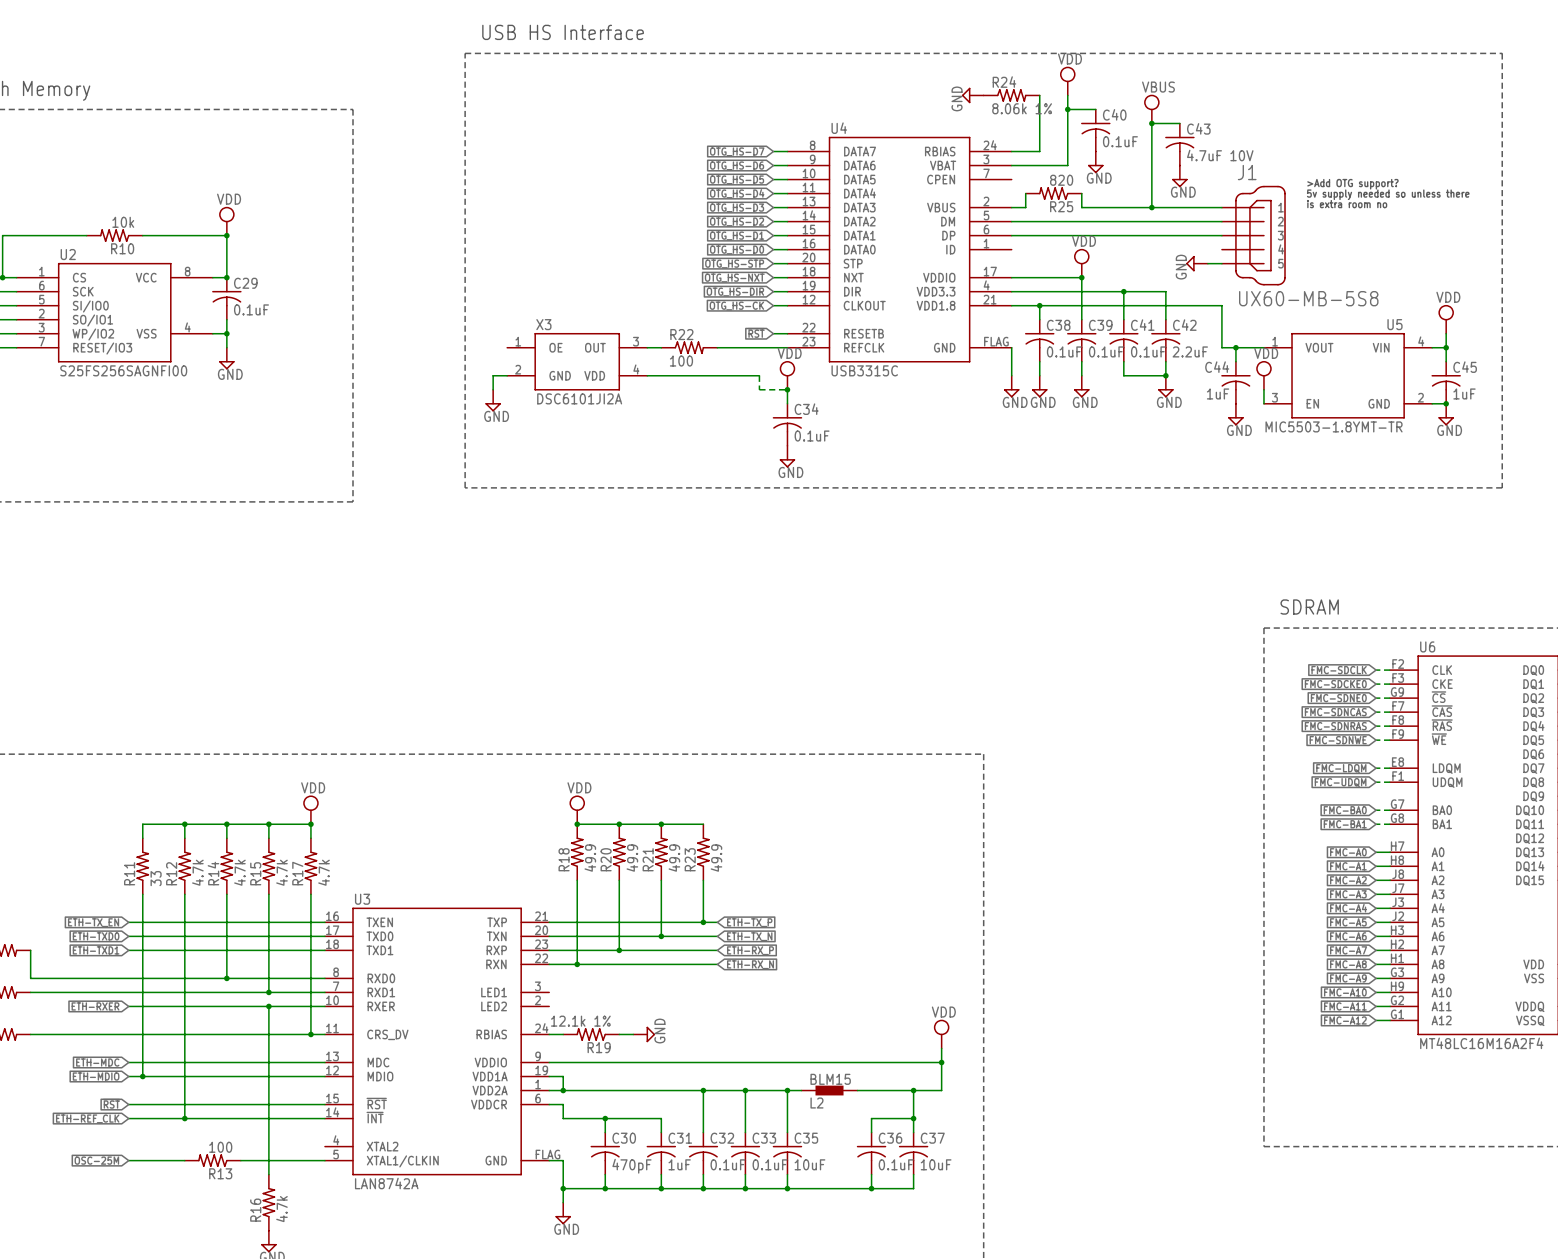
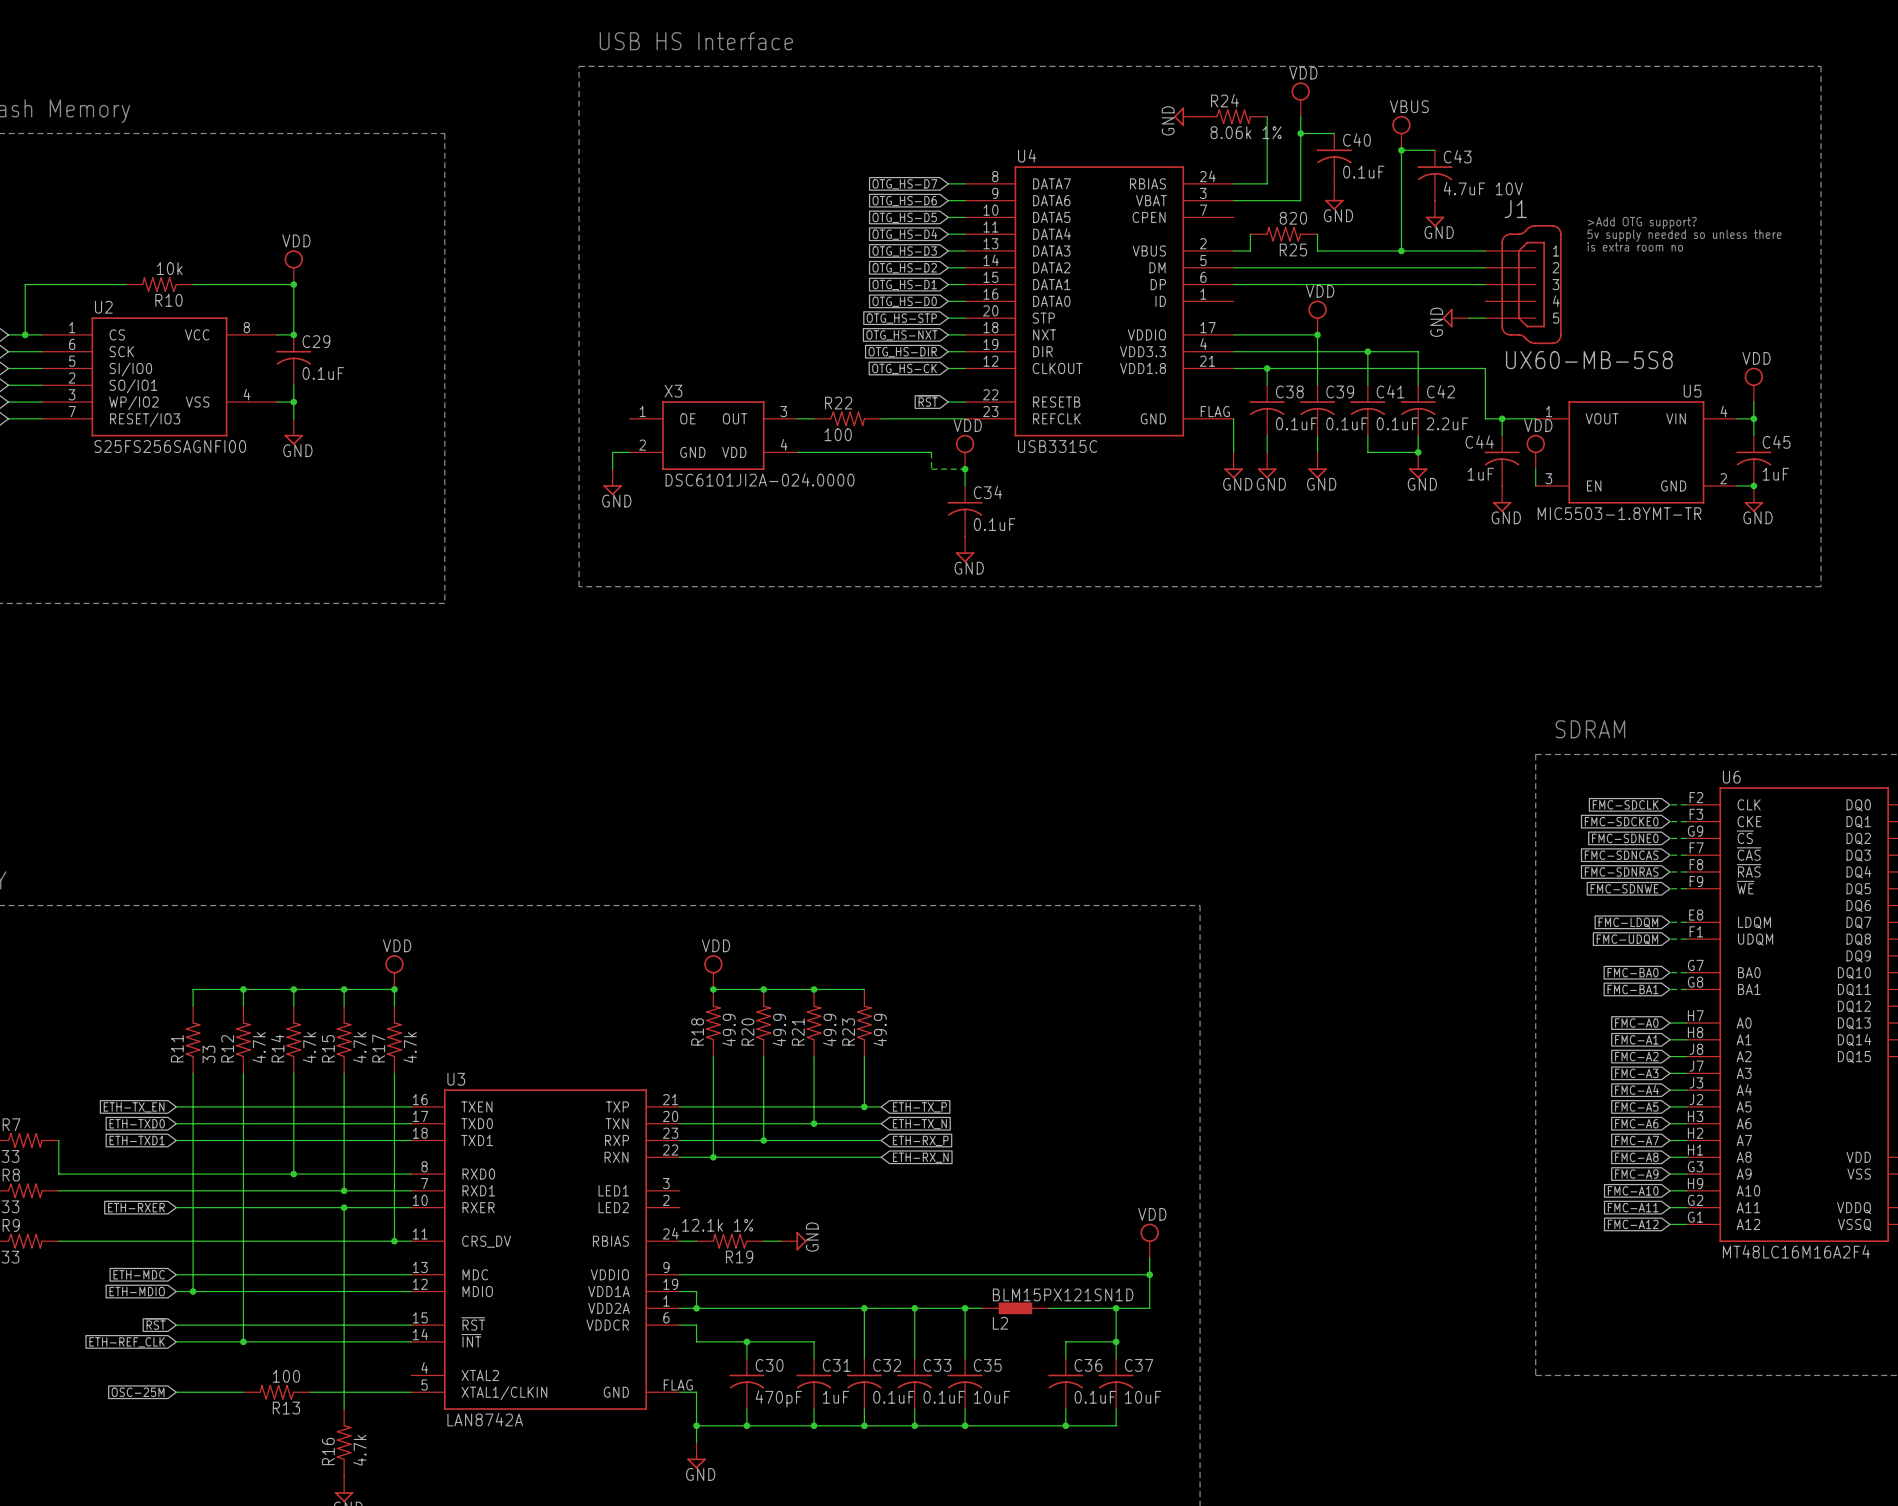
X3 value: DSC6101JI2A (579, 398) -> DSC6101JI2A-024.0000 (760, 479)
L2 value: BLM15 (830, 1079) -> BLM15PX121SN1D (1063, 1294)

